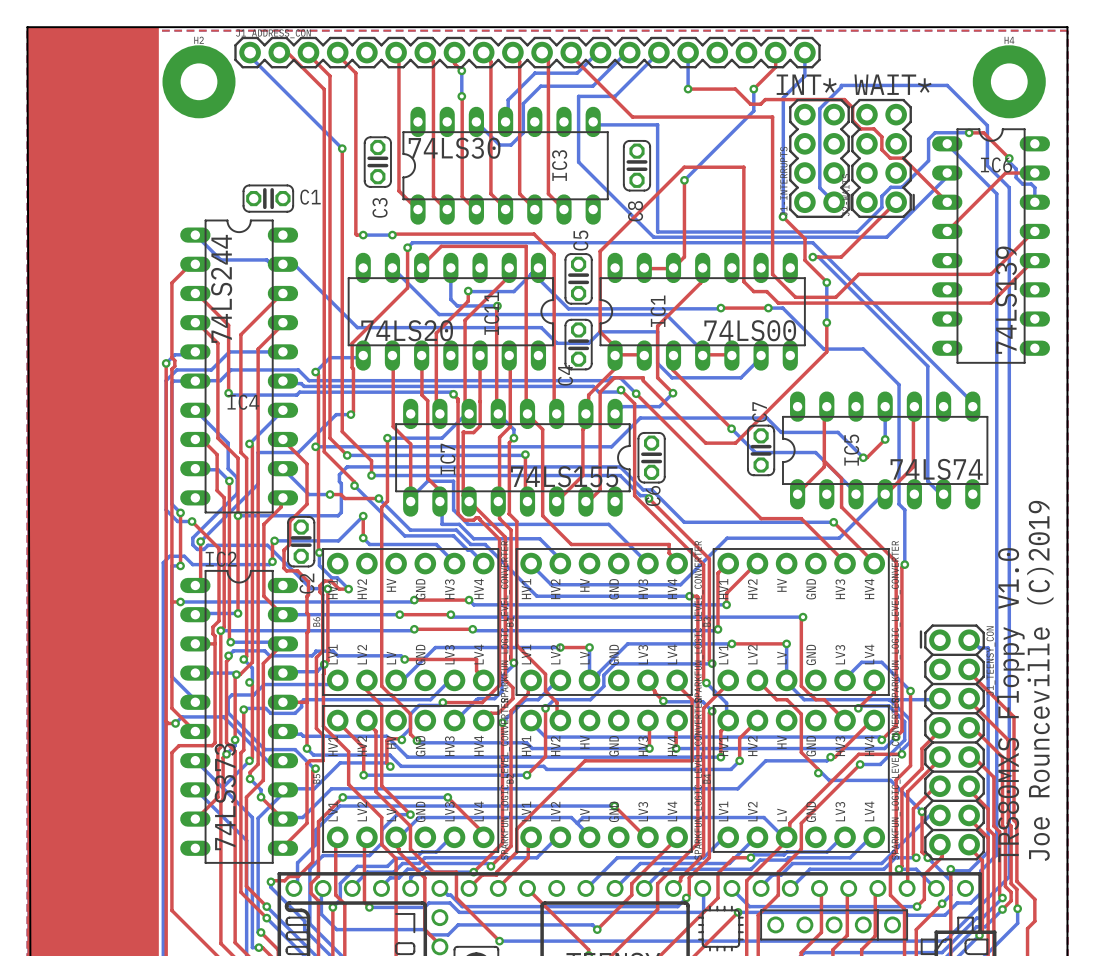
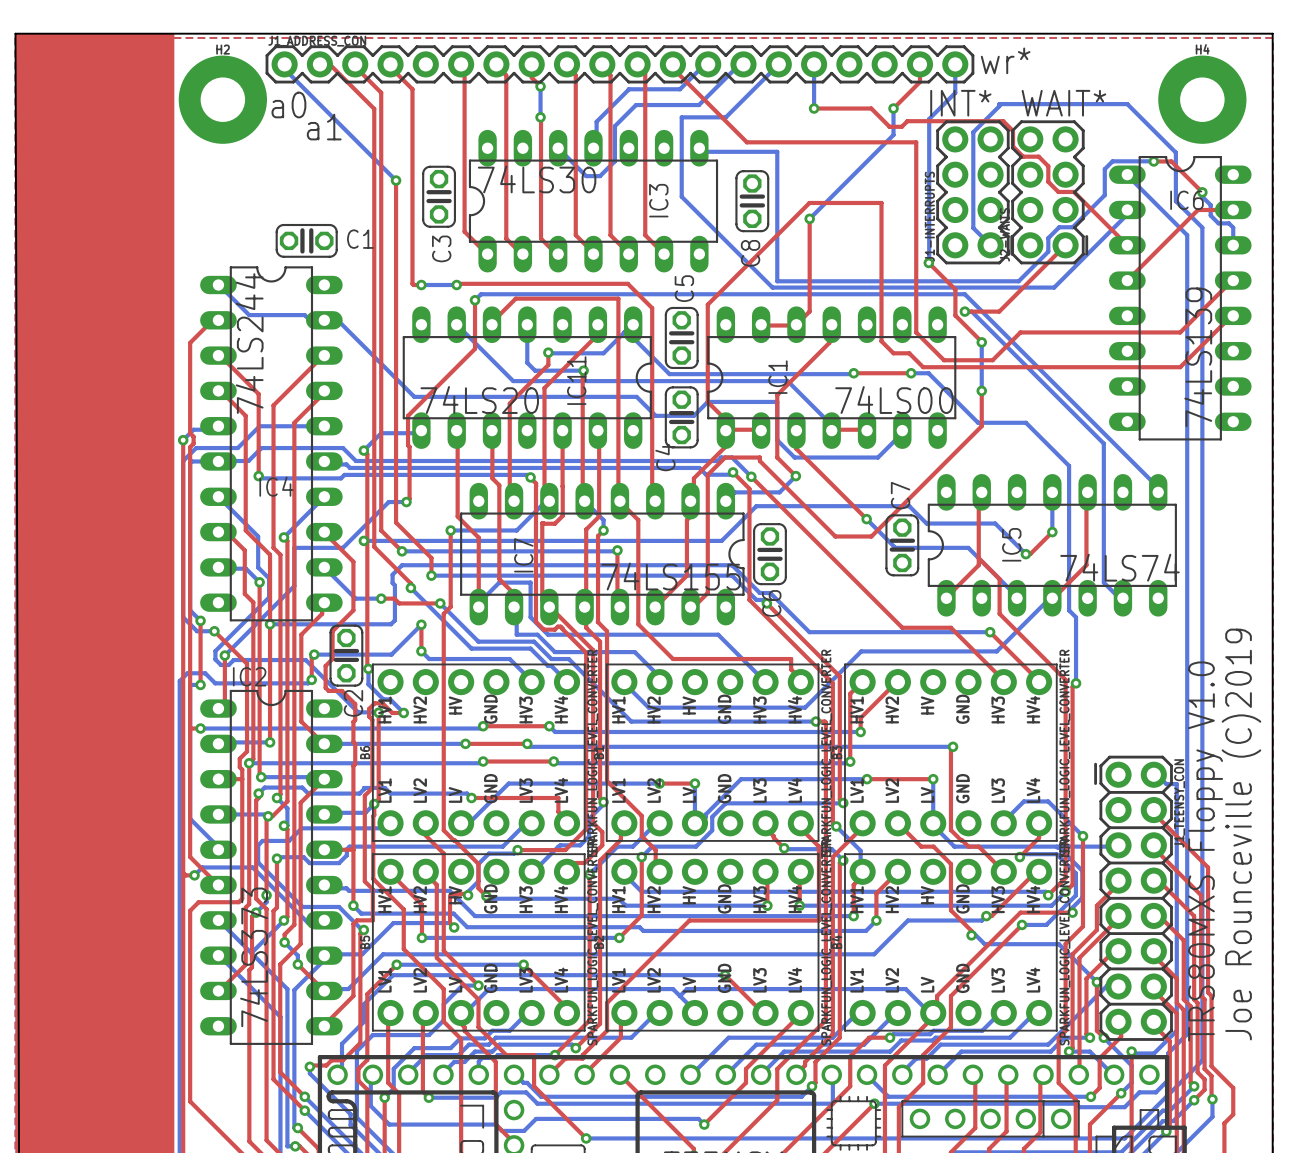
text: none -> wr* (1005, 60)
text: none -> a0 (288, 104)
text: none -> a1 (324, 127)

